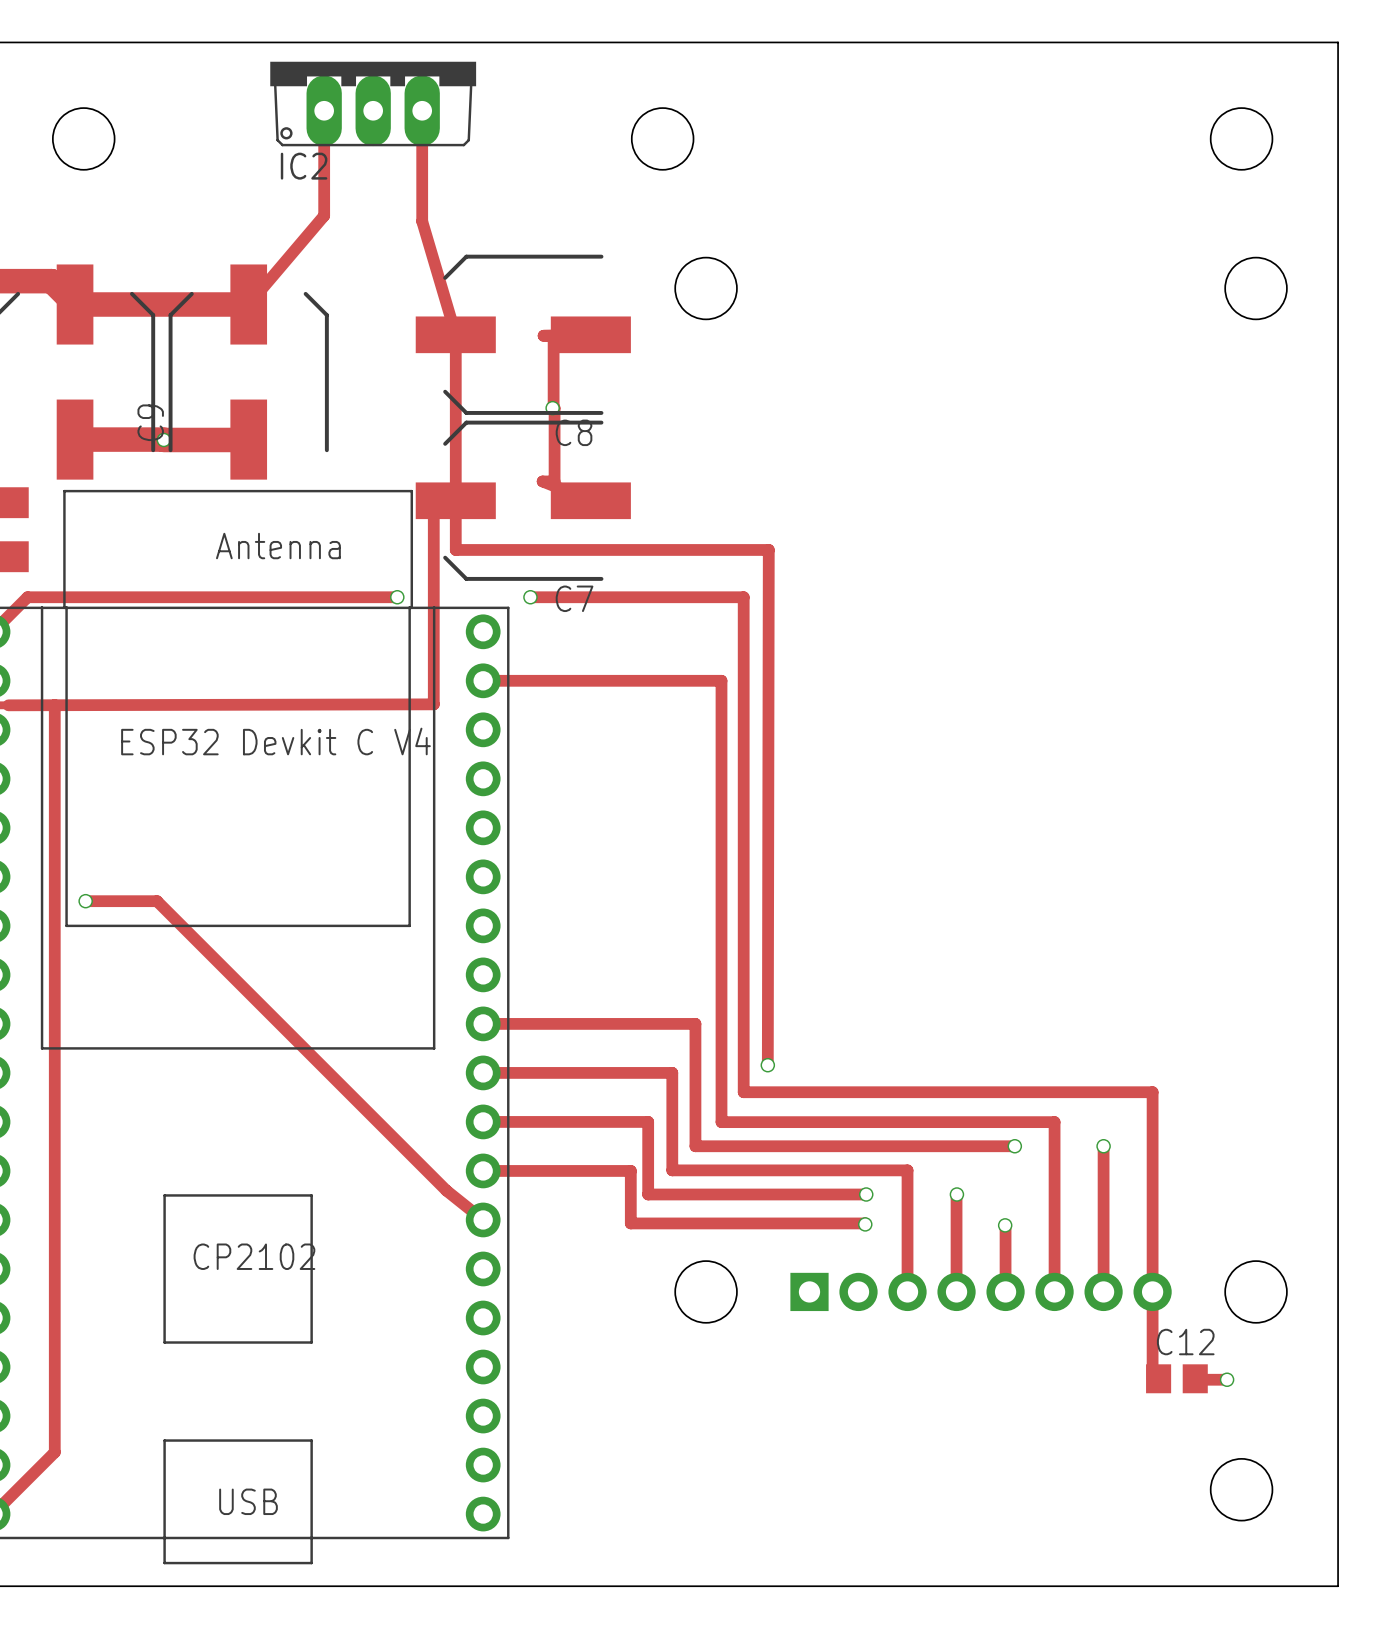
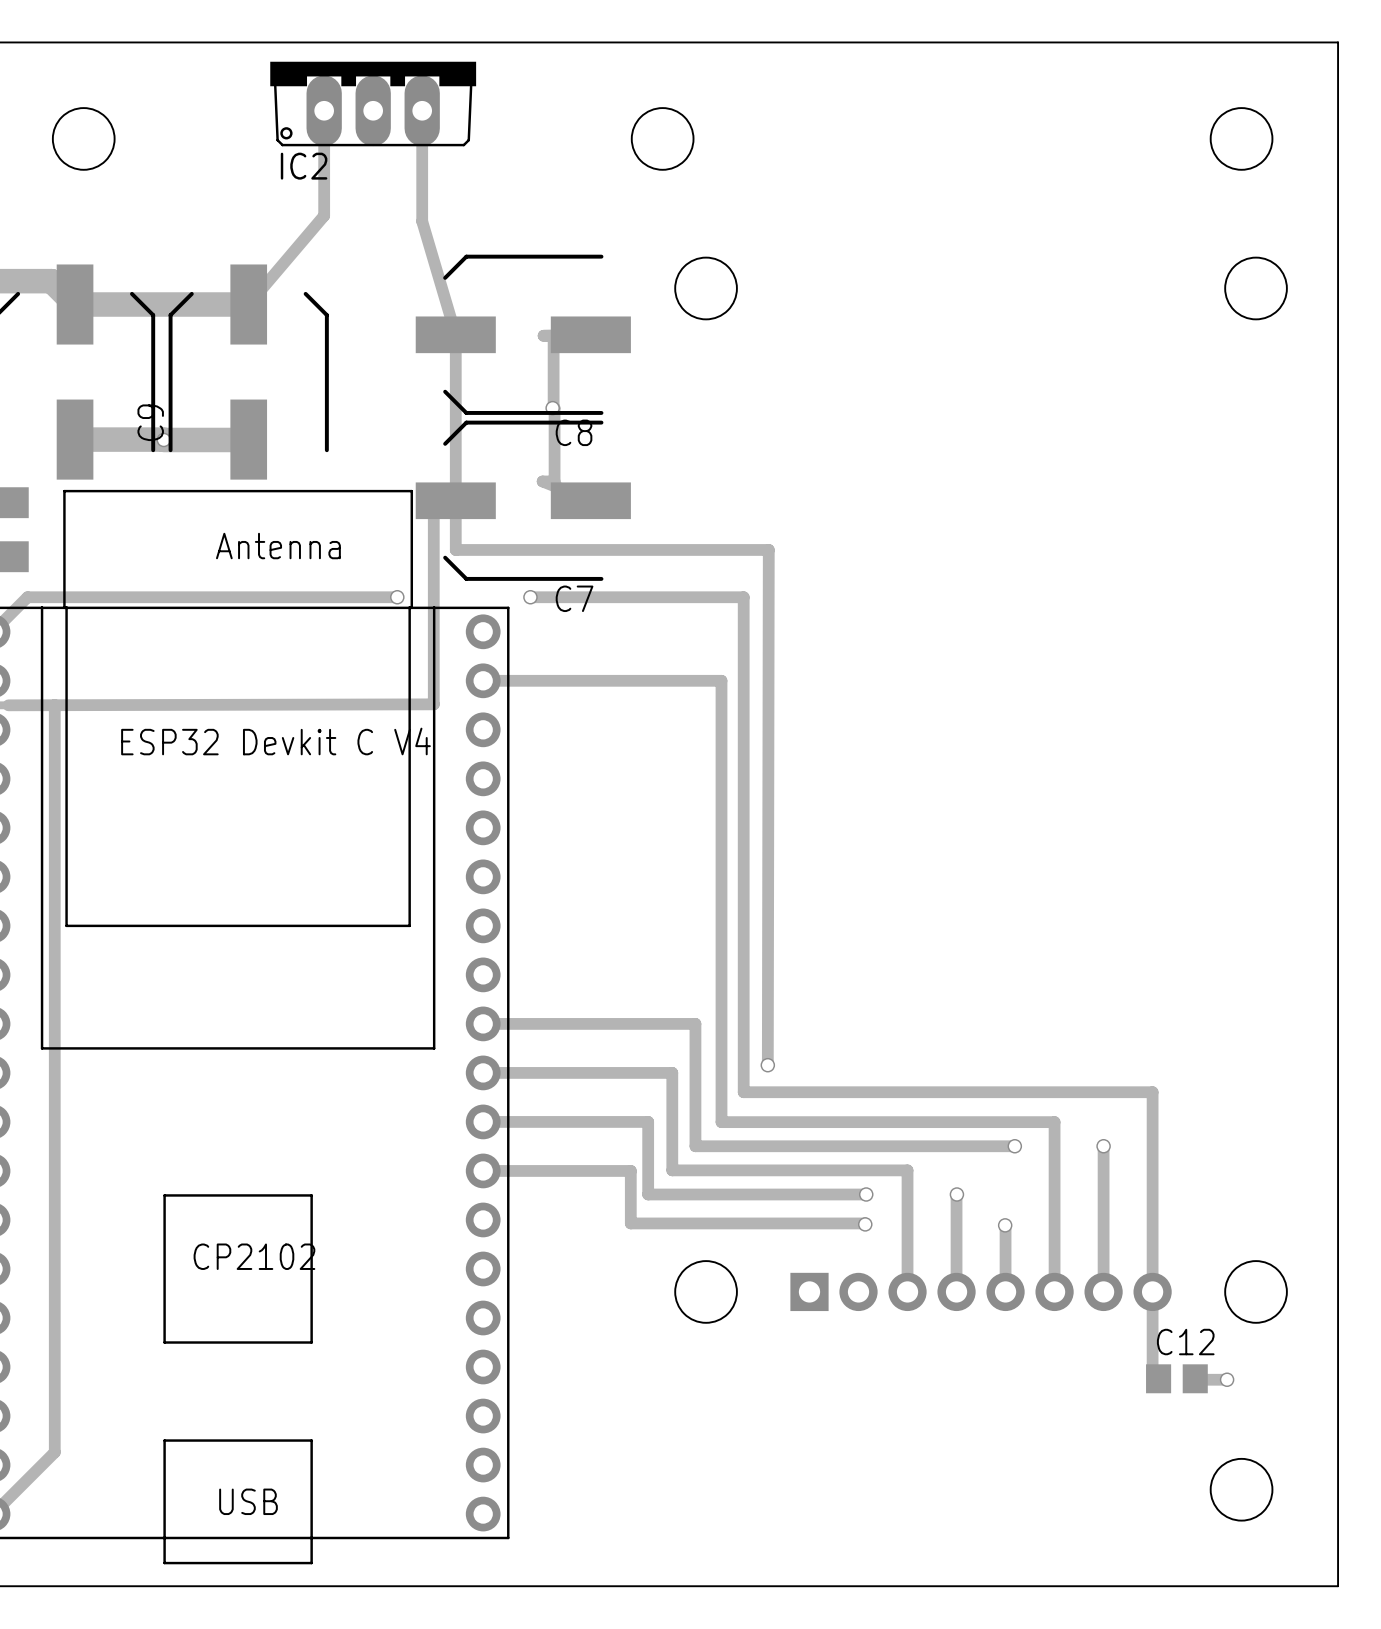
track: (85, 901) (157, 901) (446, 1190) (483, 1219) -> none
via: (85, 901) -> none

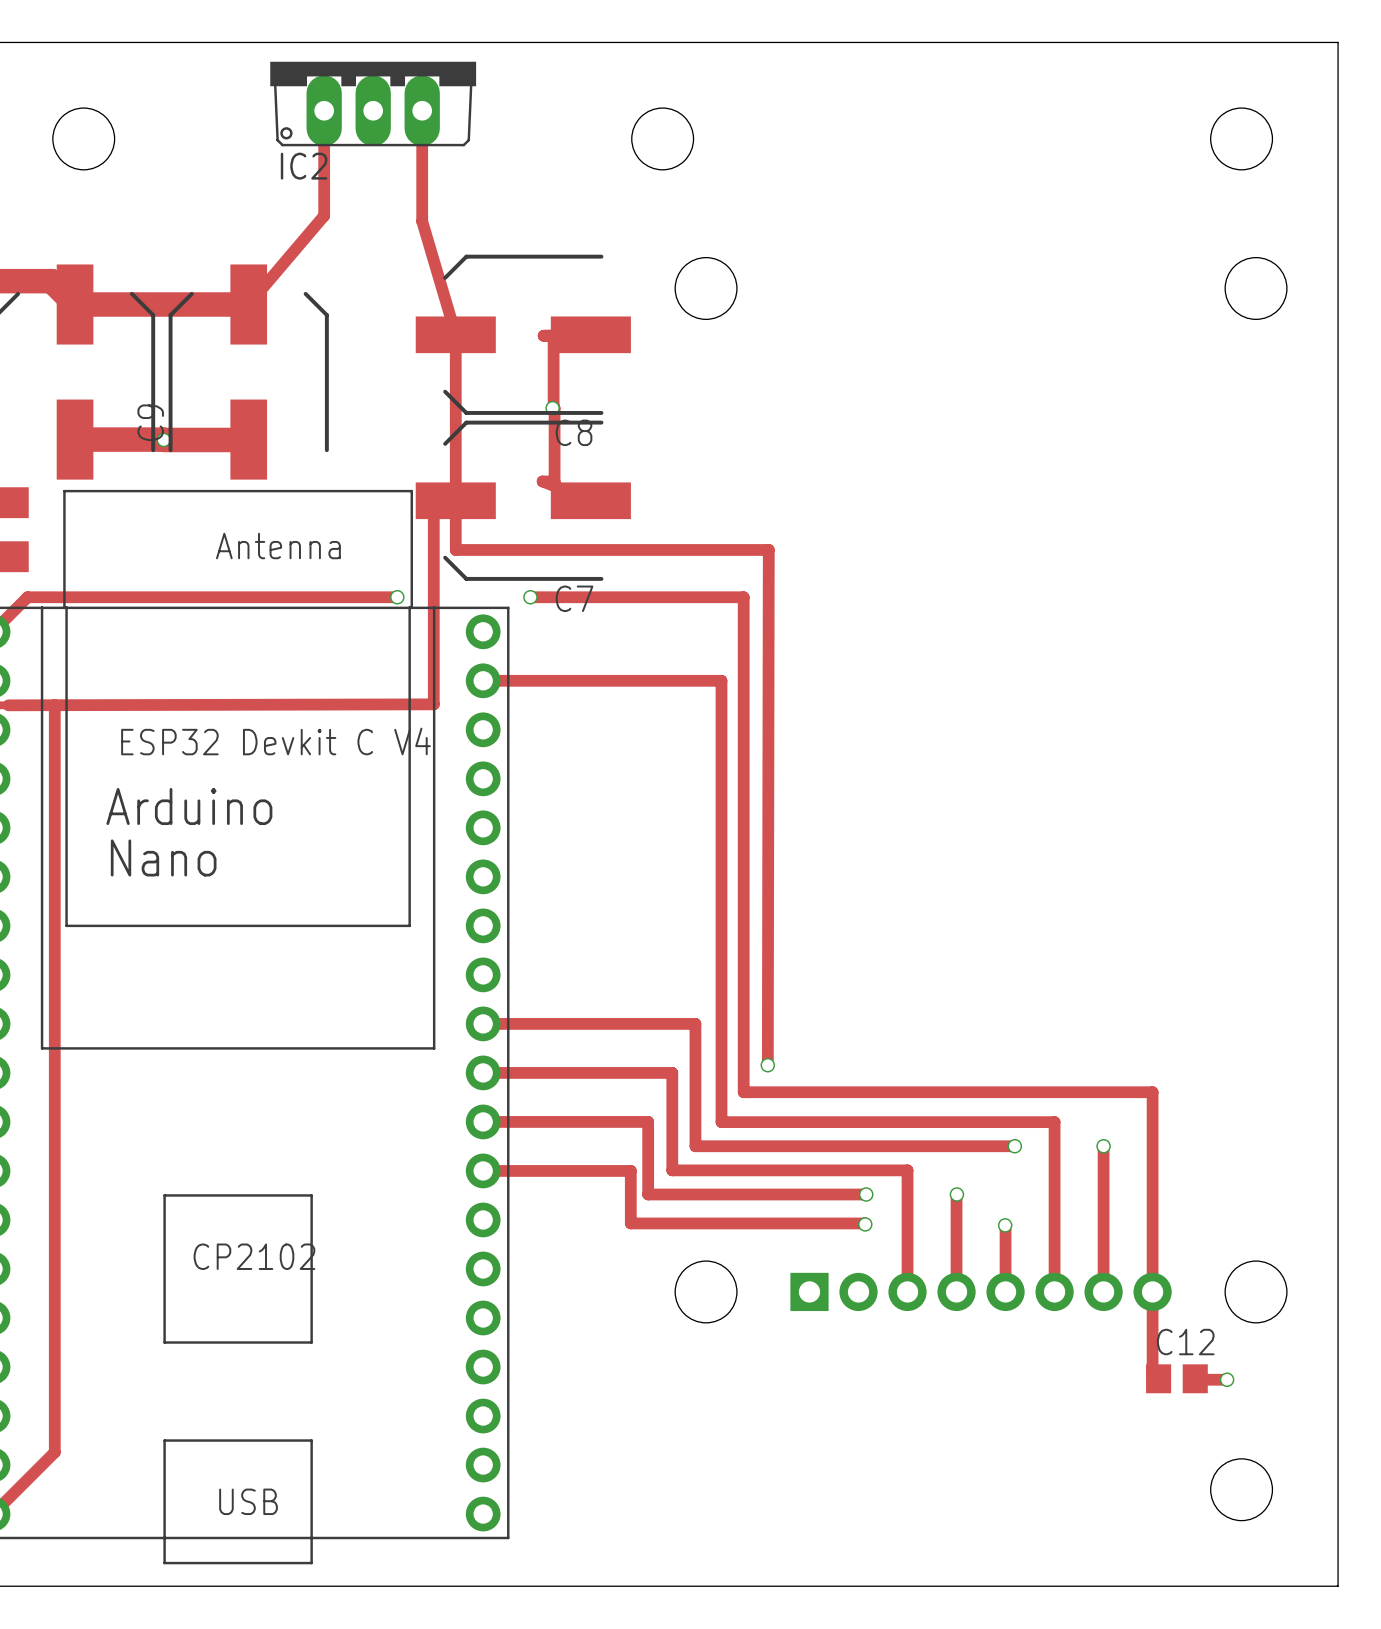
text: none -> Arduino (189, 806)
text: none -> Nano (163, 857)

